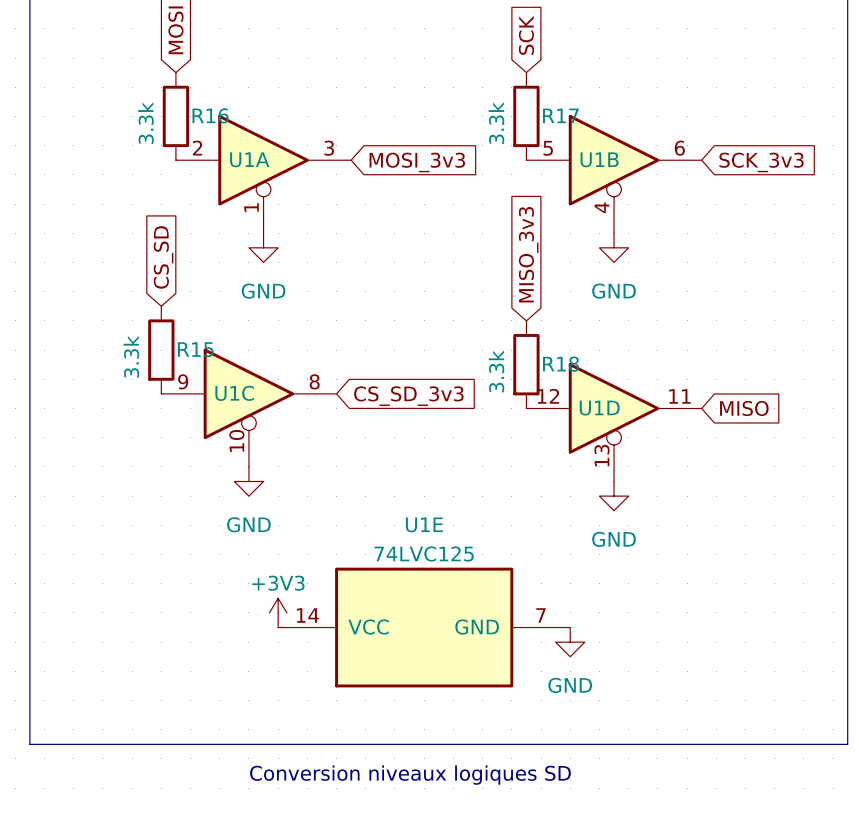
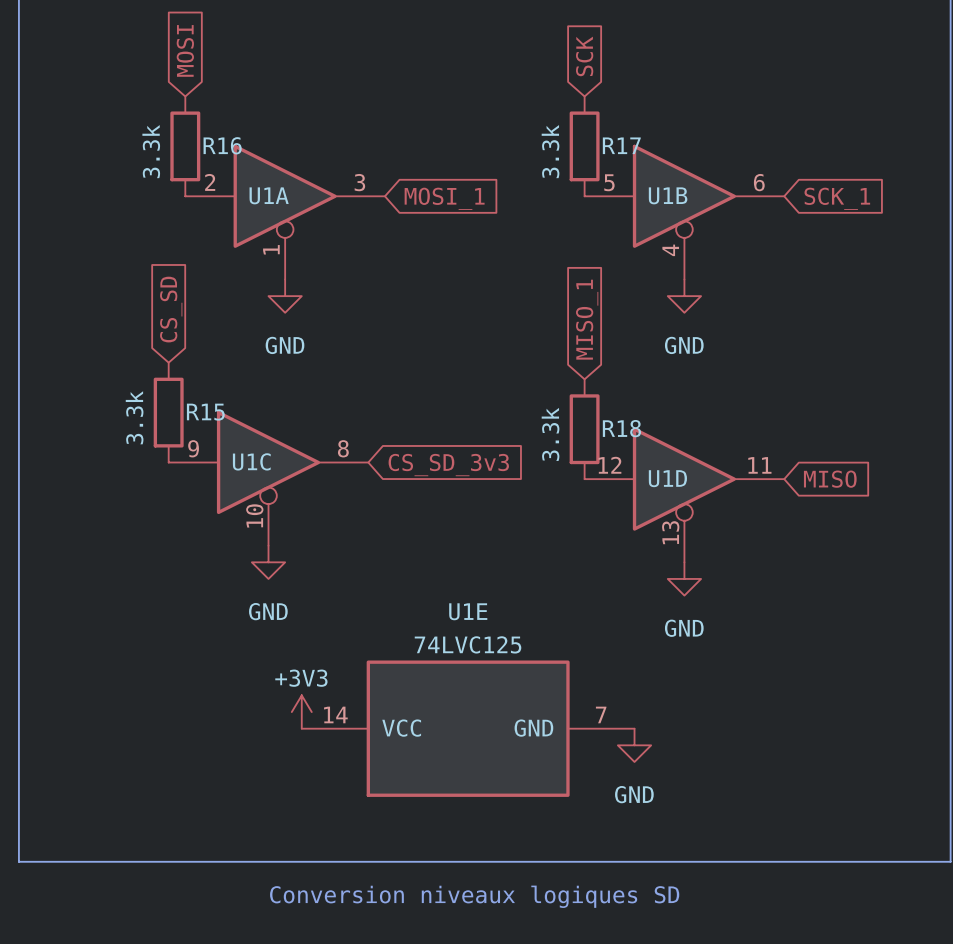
global label: MOSI_3v3 (417, 162) -> MOSI_1 (444, 198)
global label: SCK_3v3 (761, 162) -> SCK_1 (837, 198)
global label: MISO_3v3 (528, 254) -> MISO_1 (587, 319)

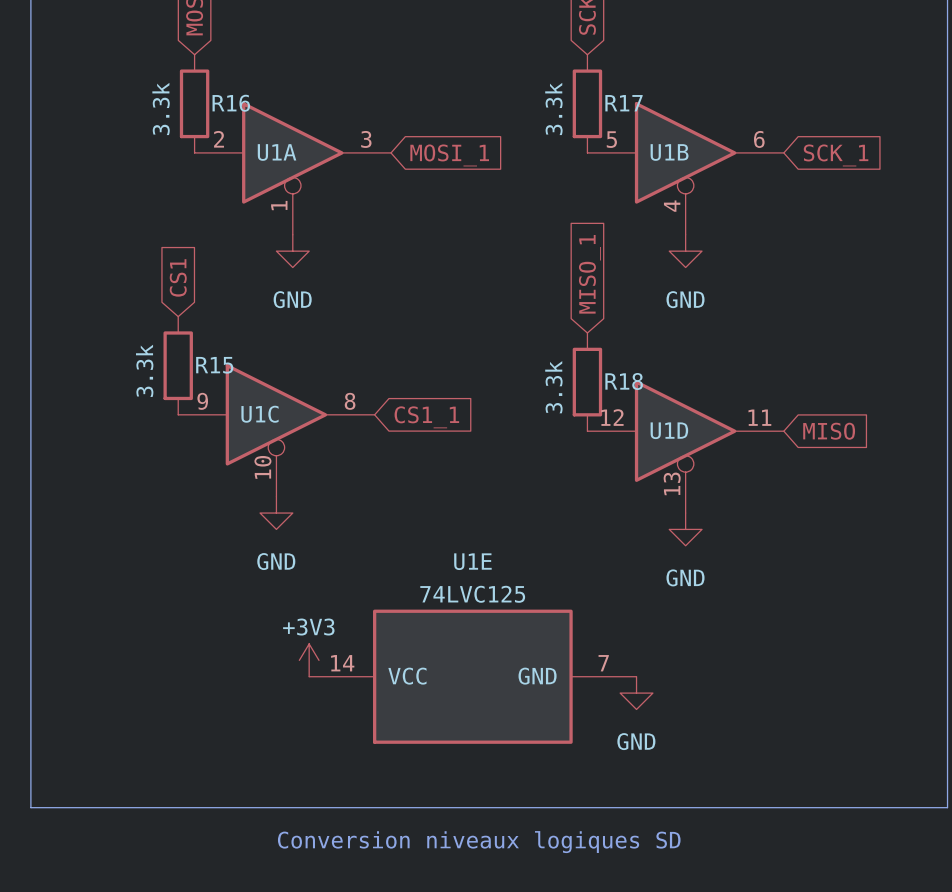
global label: CS_SD (171, 309) -> CS1 (178, 277)
global label: CS_SD_3v3 (448, 465) -> CS1_1 (426, 417)

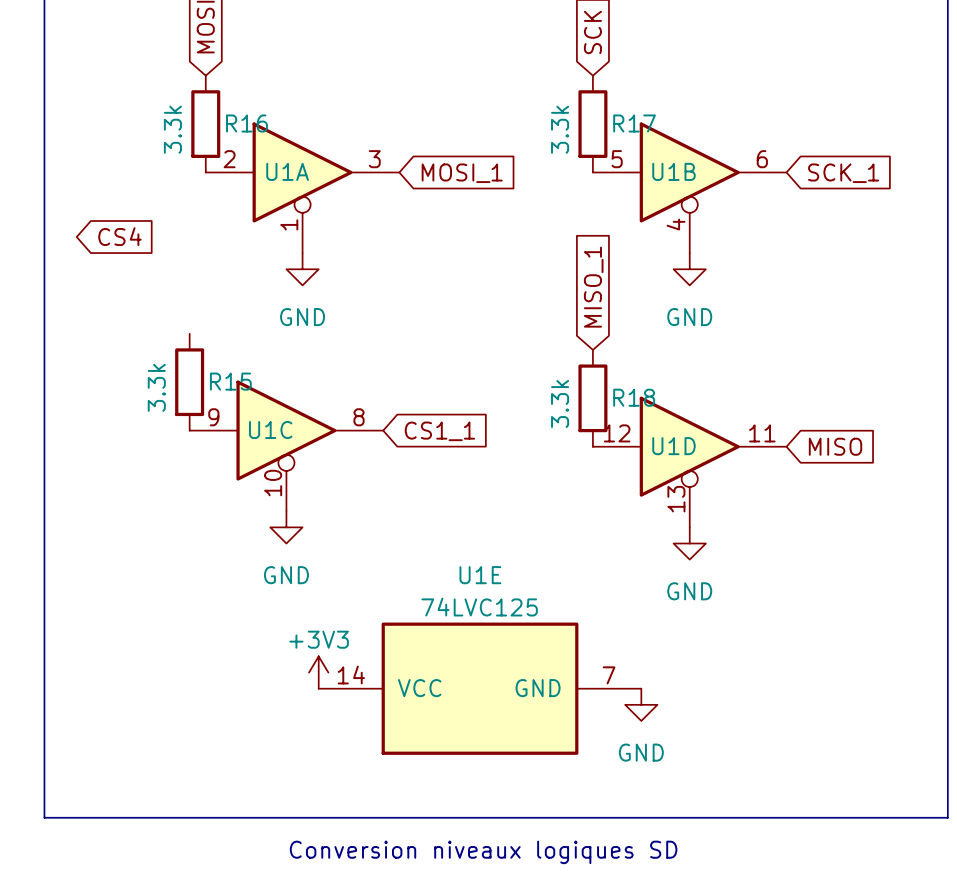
global label: none -> CS4 (119, 236)
global label: CS1 (178, 277) -> none

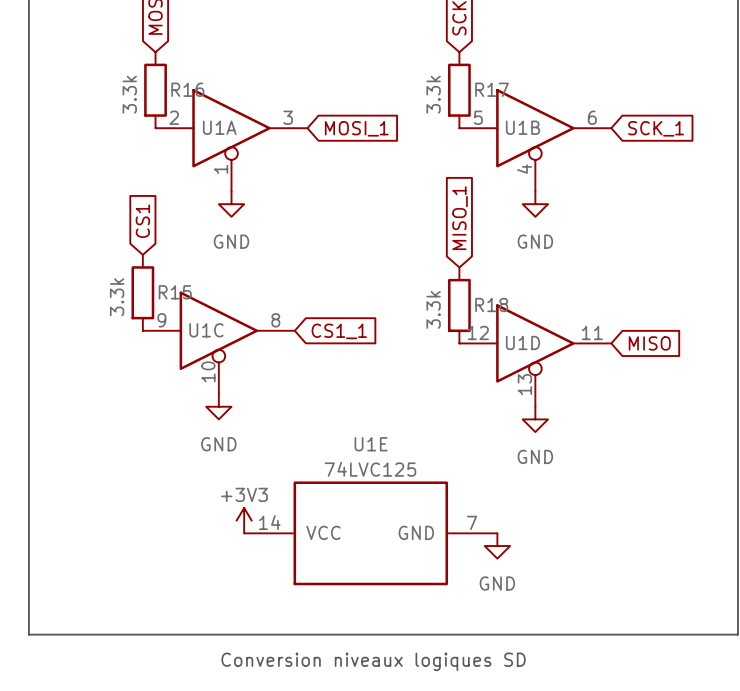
global label: CS4 (119, 236) -> none
global label: none -> CS1 (142, 221)

